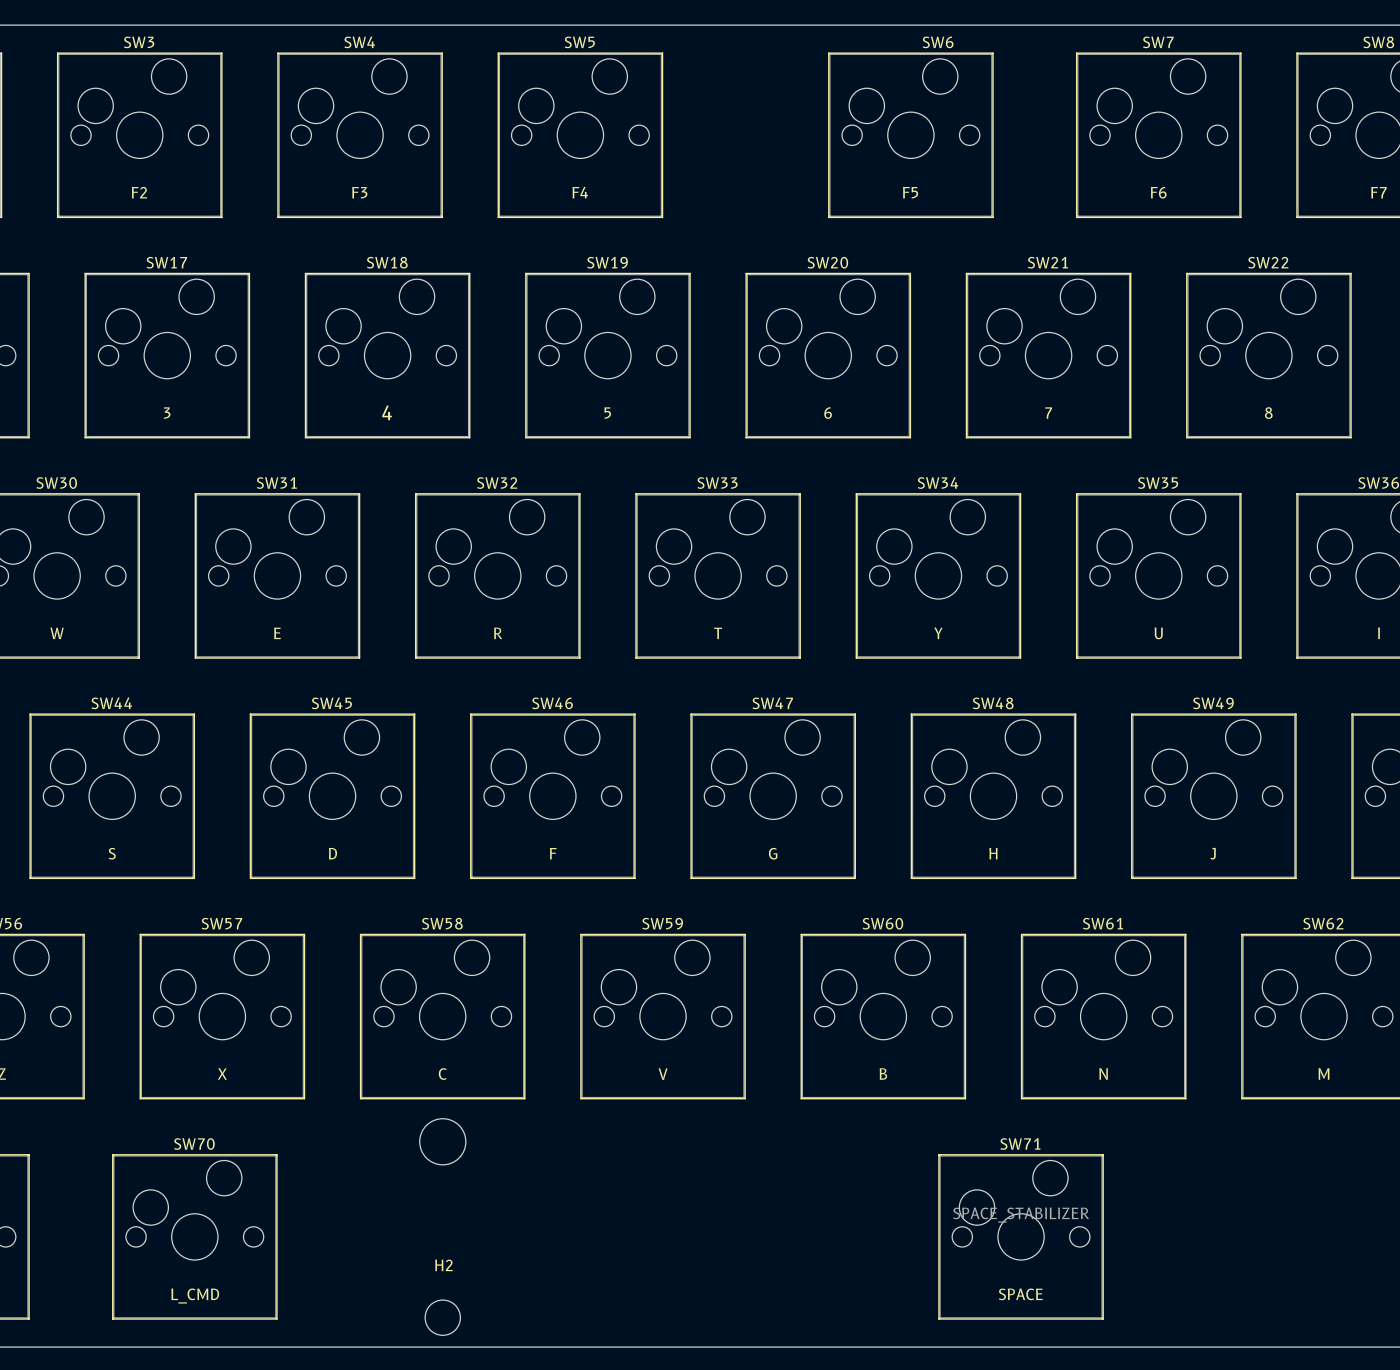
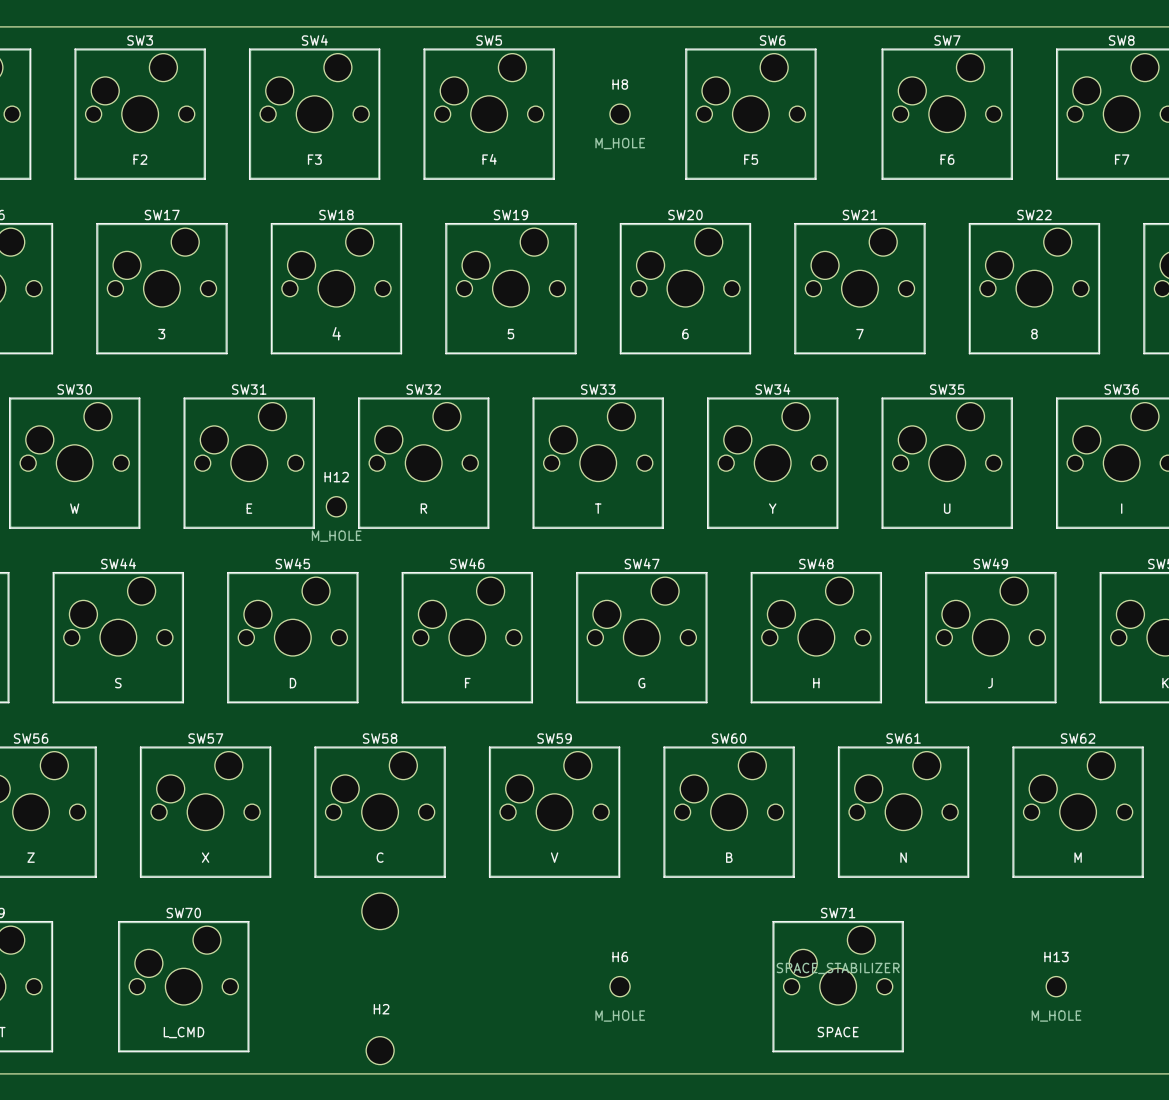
H8: none -> M_HOLE (620, 114)
H12: none -> M_HOLE (336, 506)
H6: none -> M_HOLE (620, 986)
H13: none -> M_HOLE (1056, 986)

